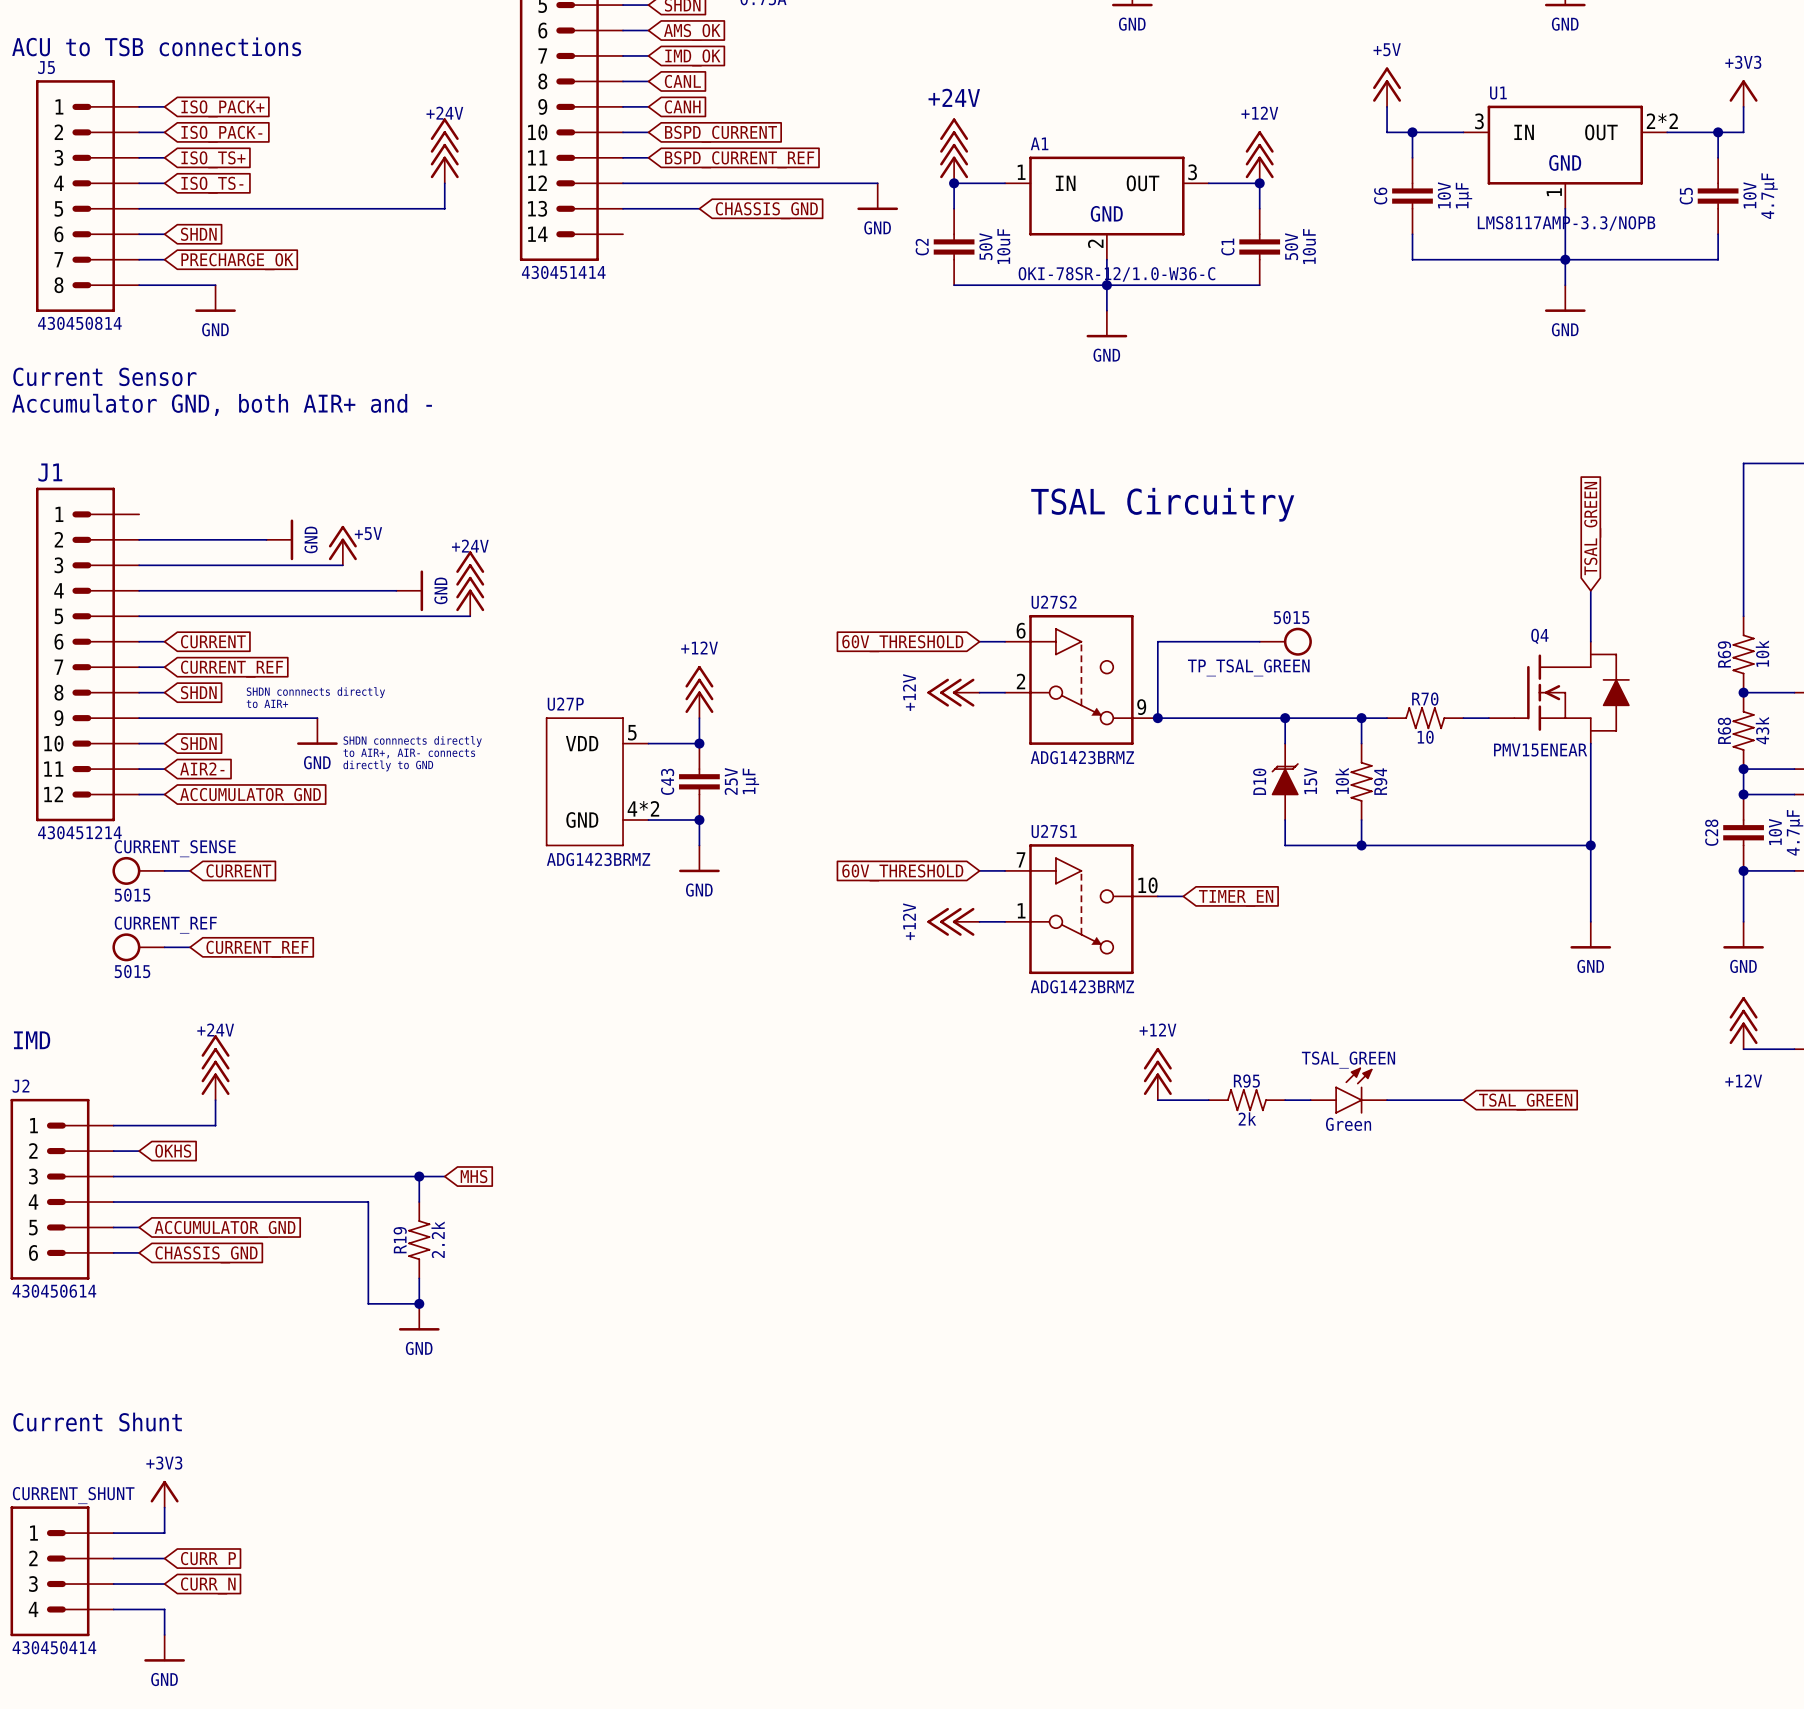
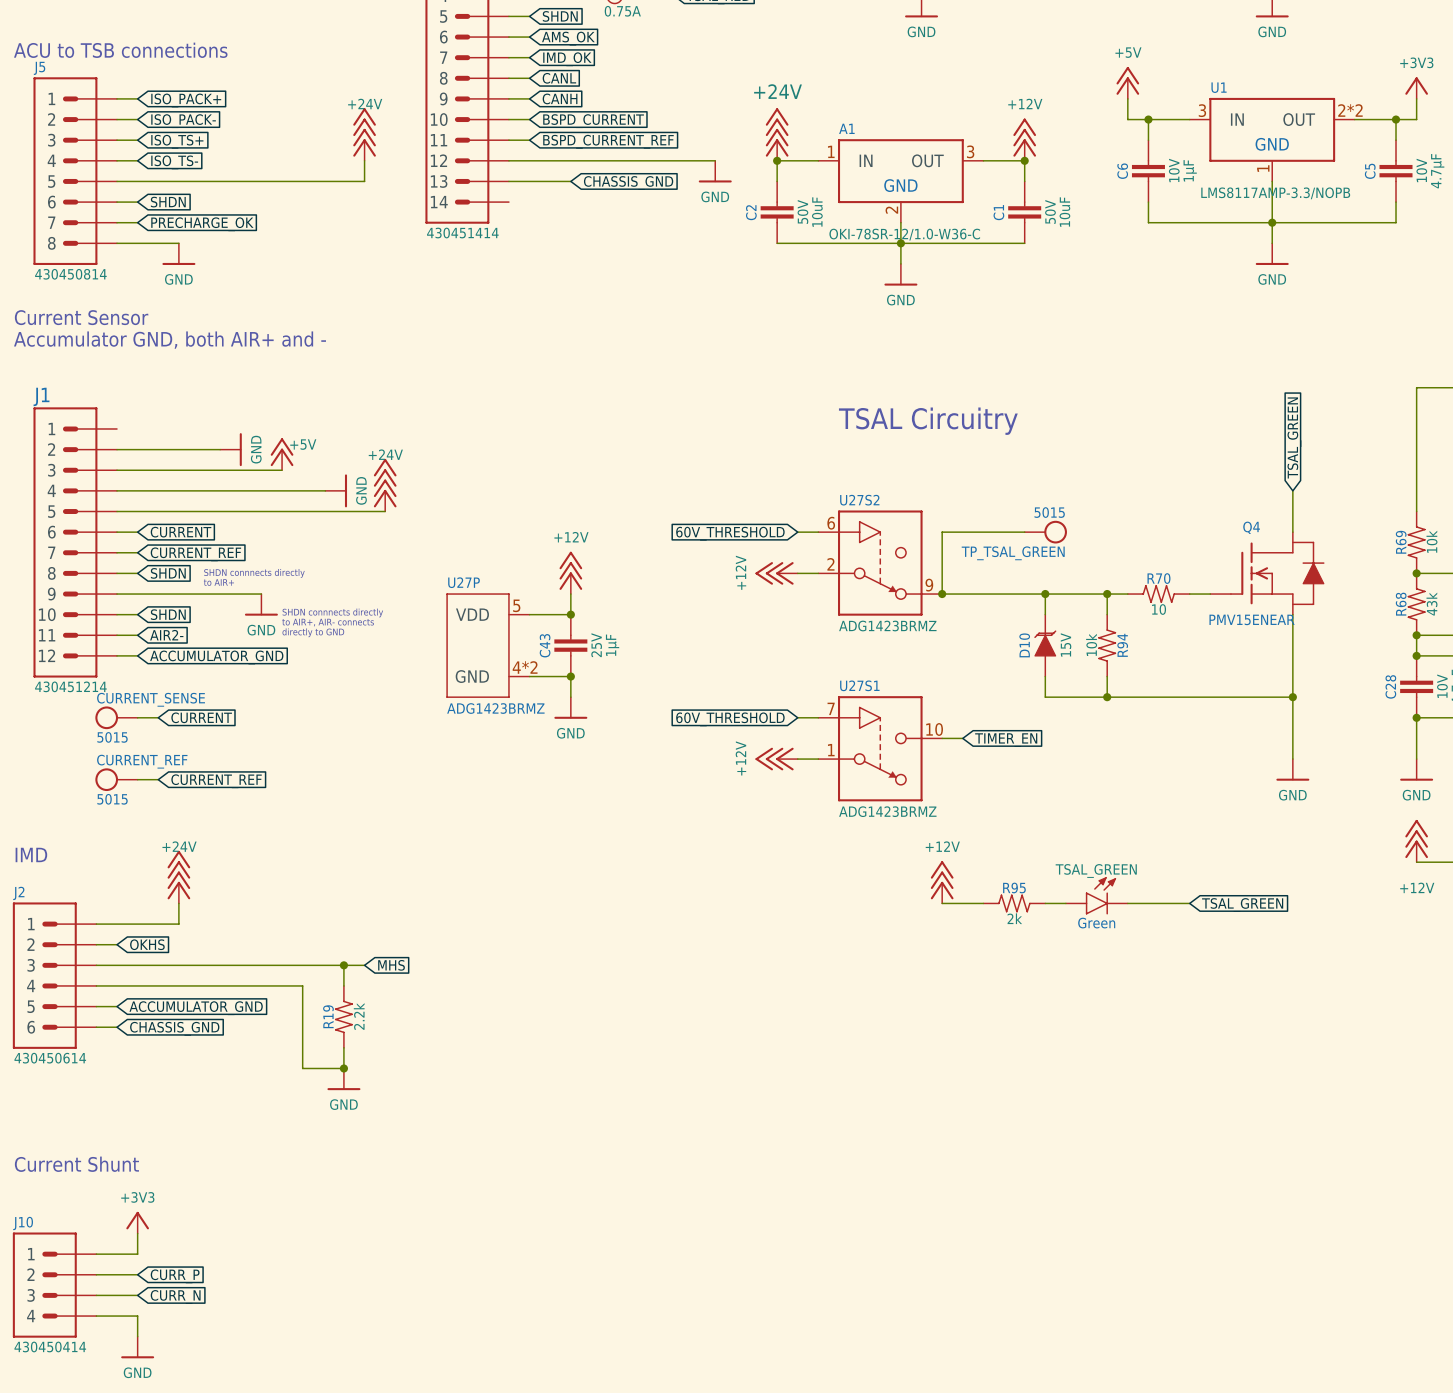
CURRENT_SHUNT name: CURRENT_SHUNT (73, 1495) -> J10 (23, 1223)

